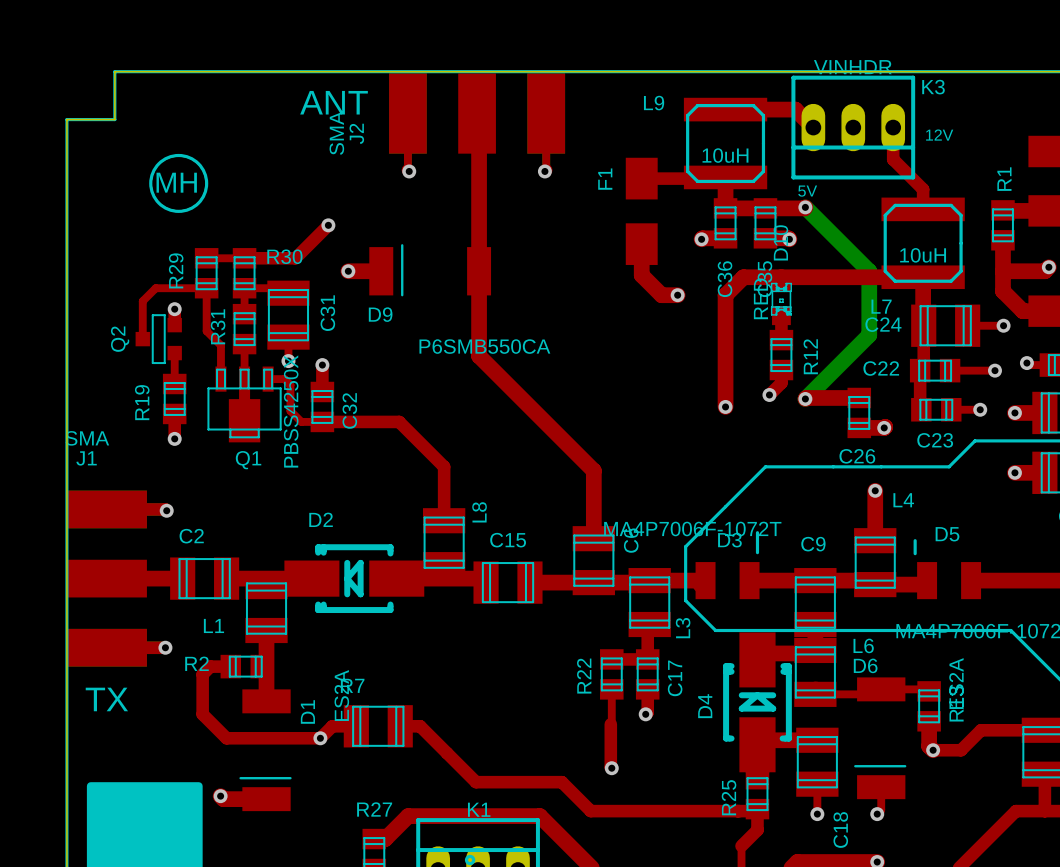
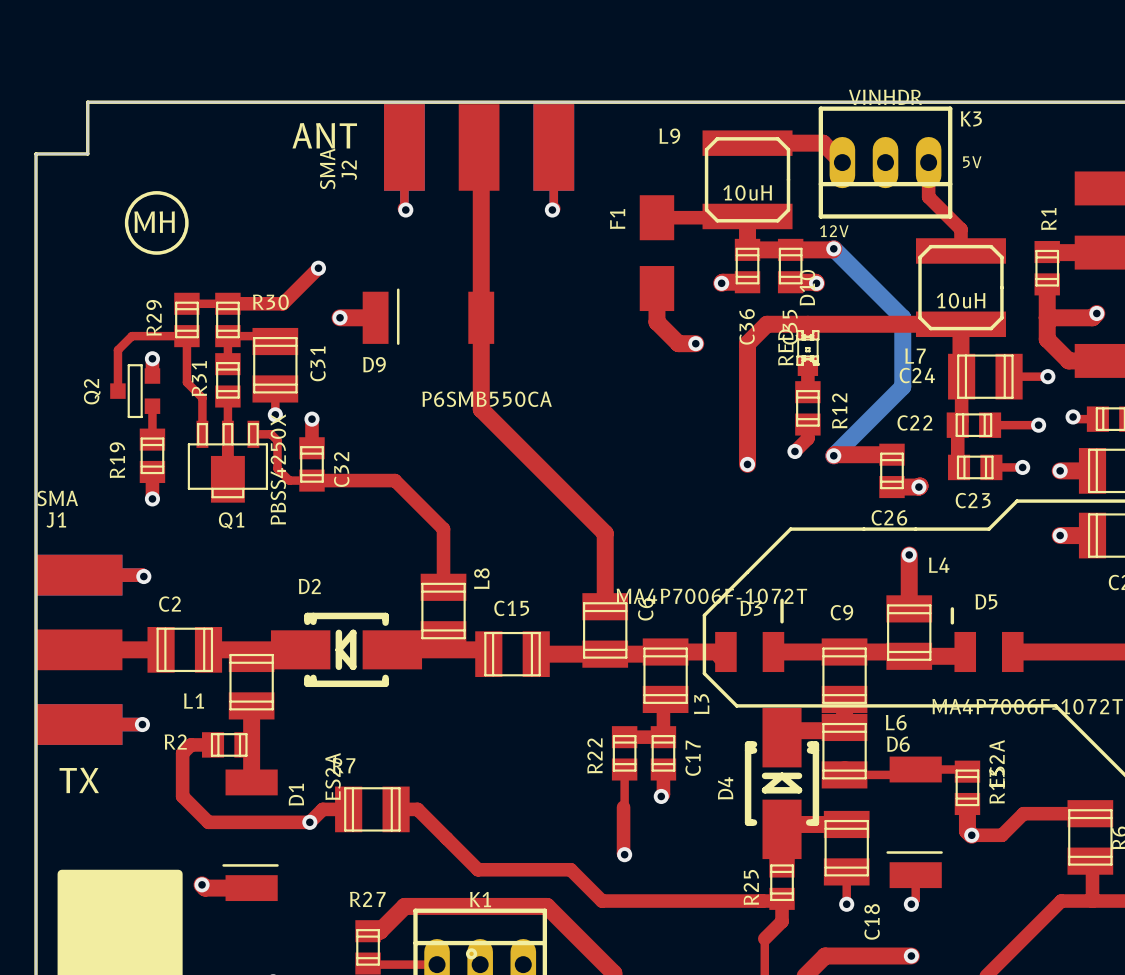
text: 12V (939, 135) -> 5V (972, 162)
text: 5V (807, 191) -> 12V (834, 231)

